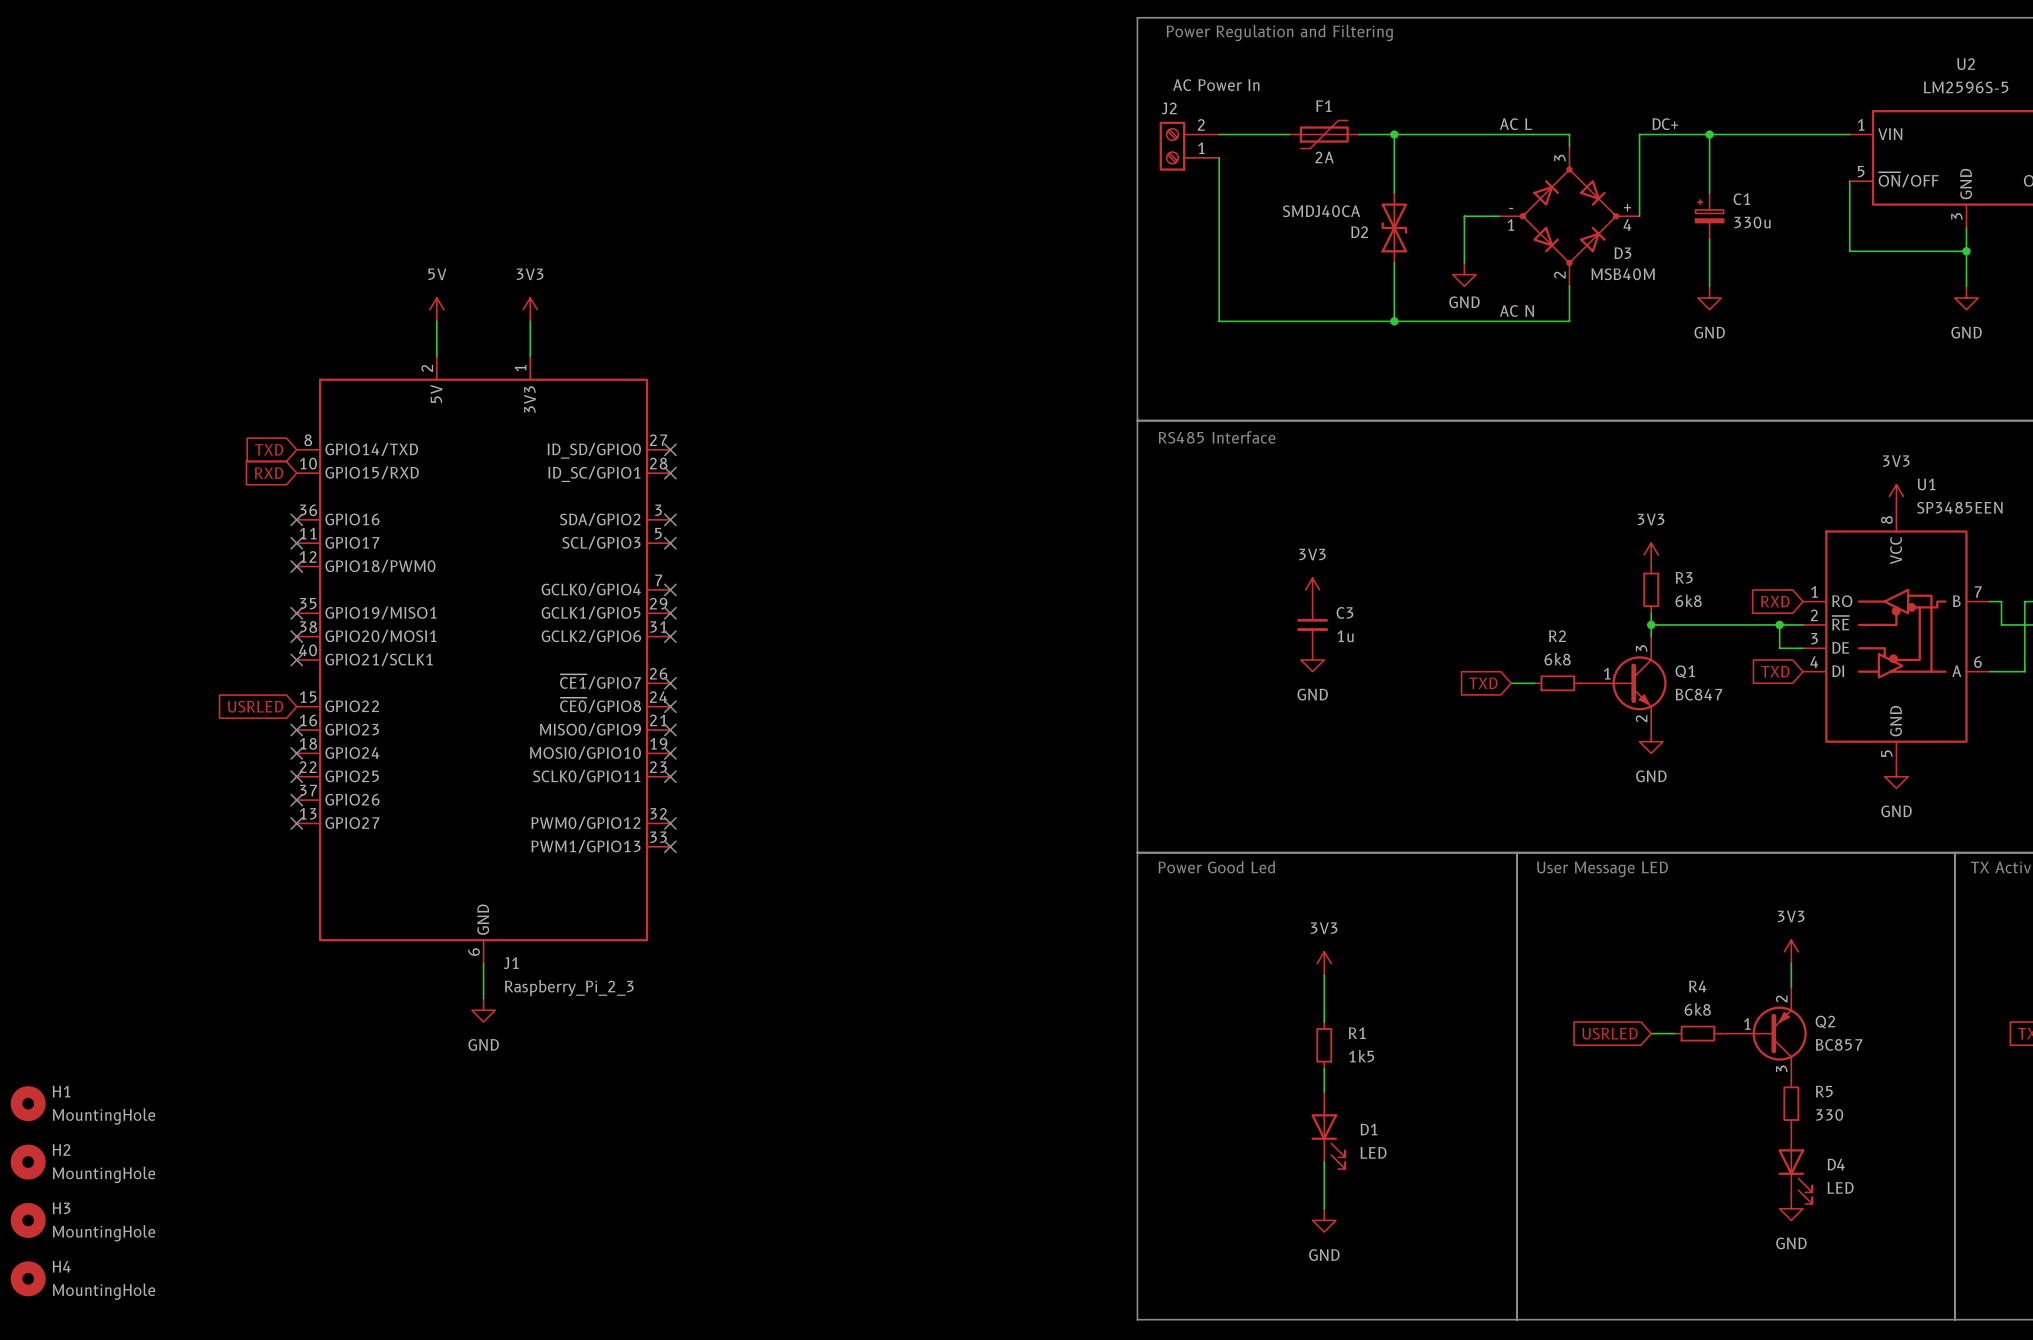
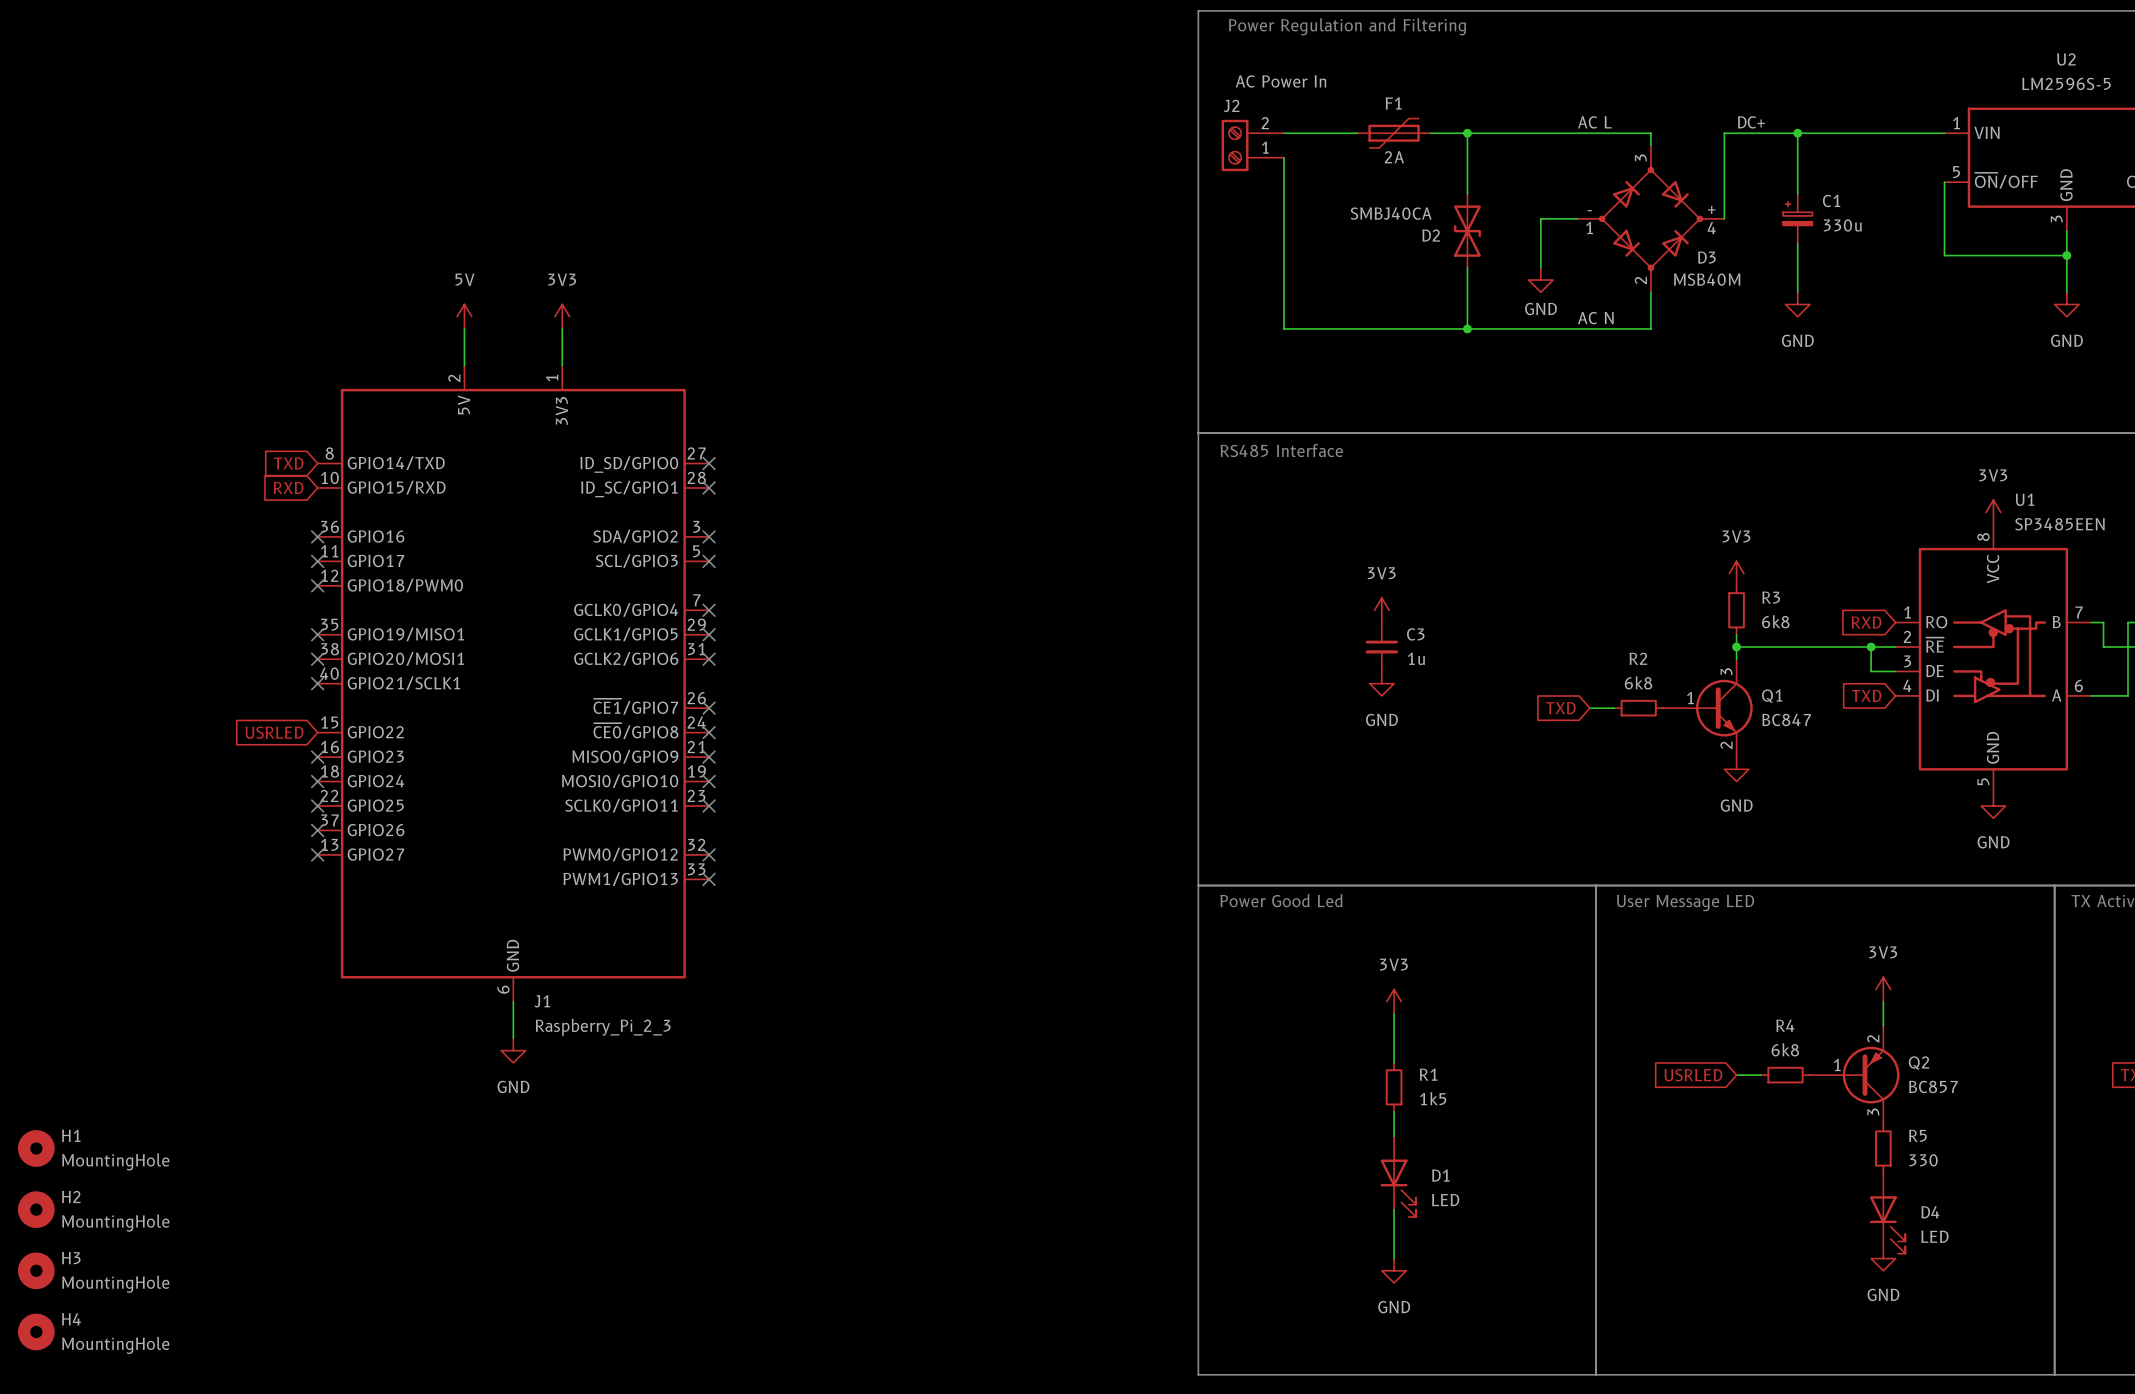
D2 value: SMDJ40CA (1321, 211) -> SMBJ40CA (1391, 213)

